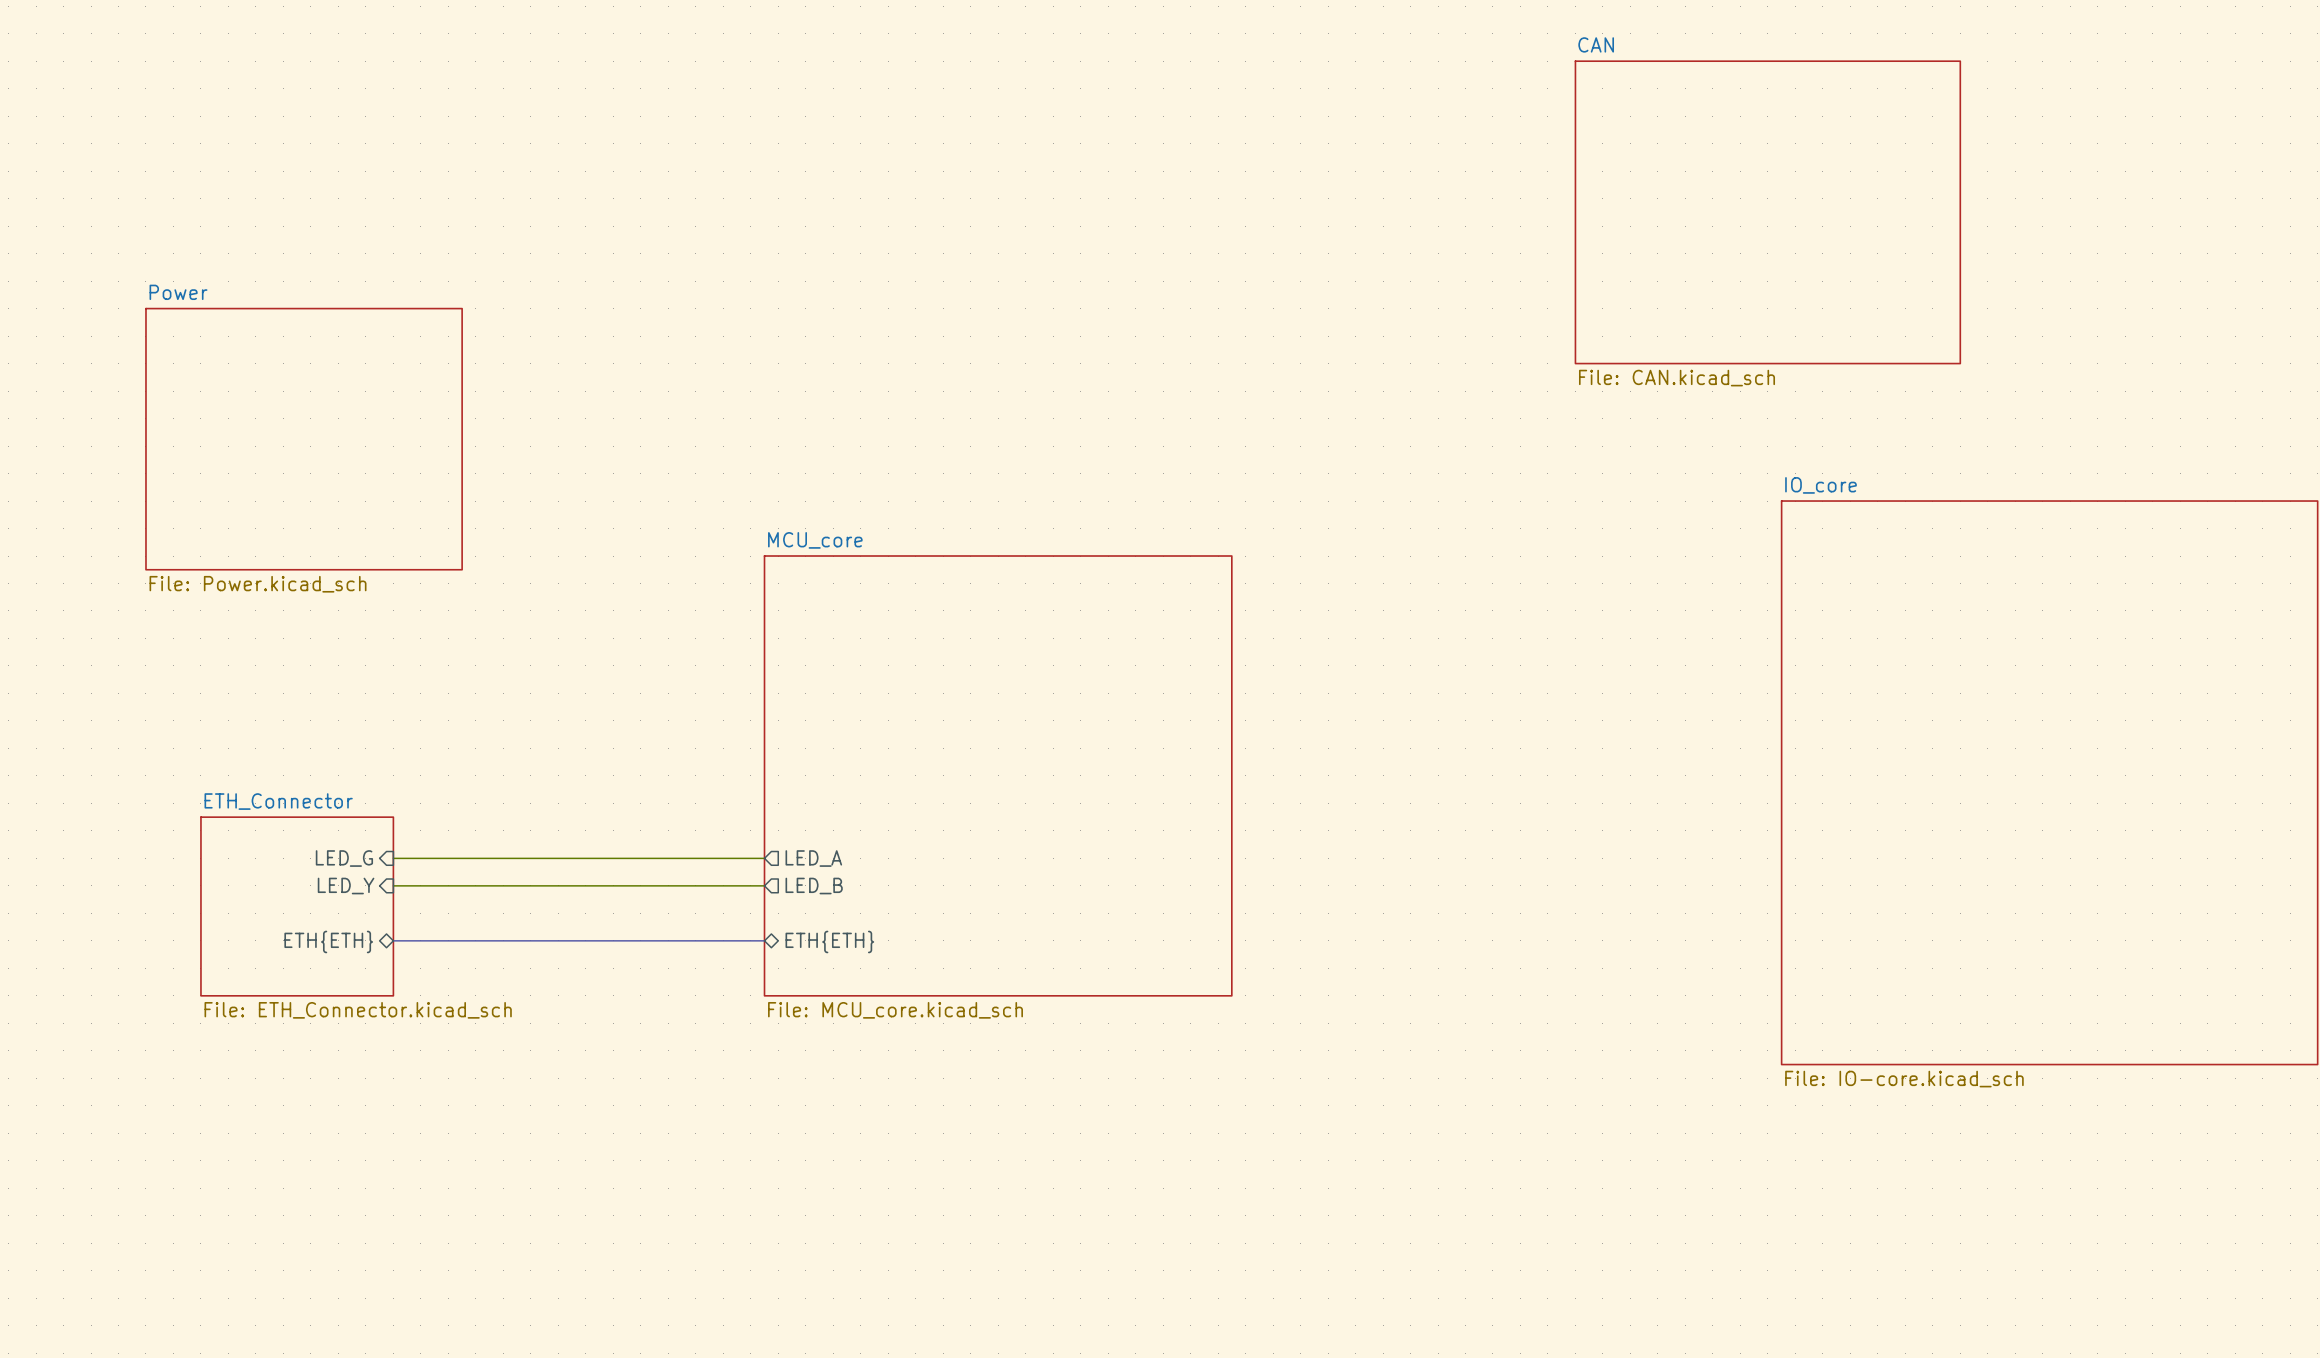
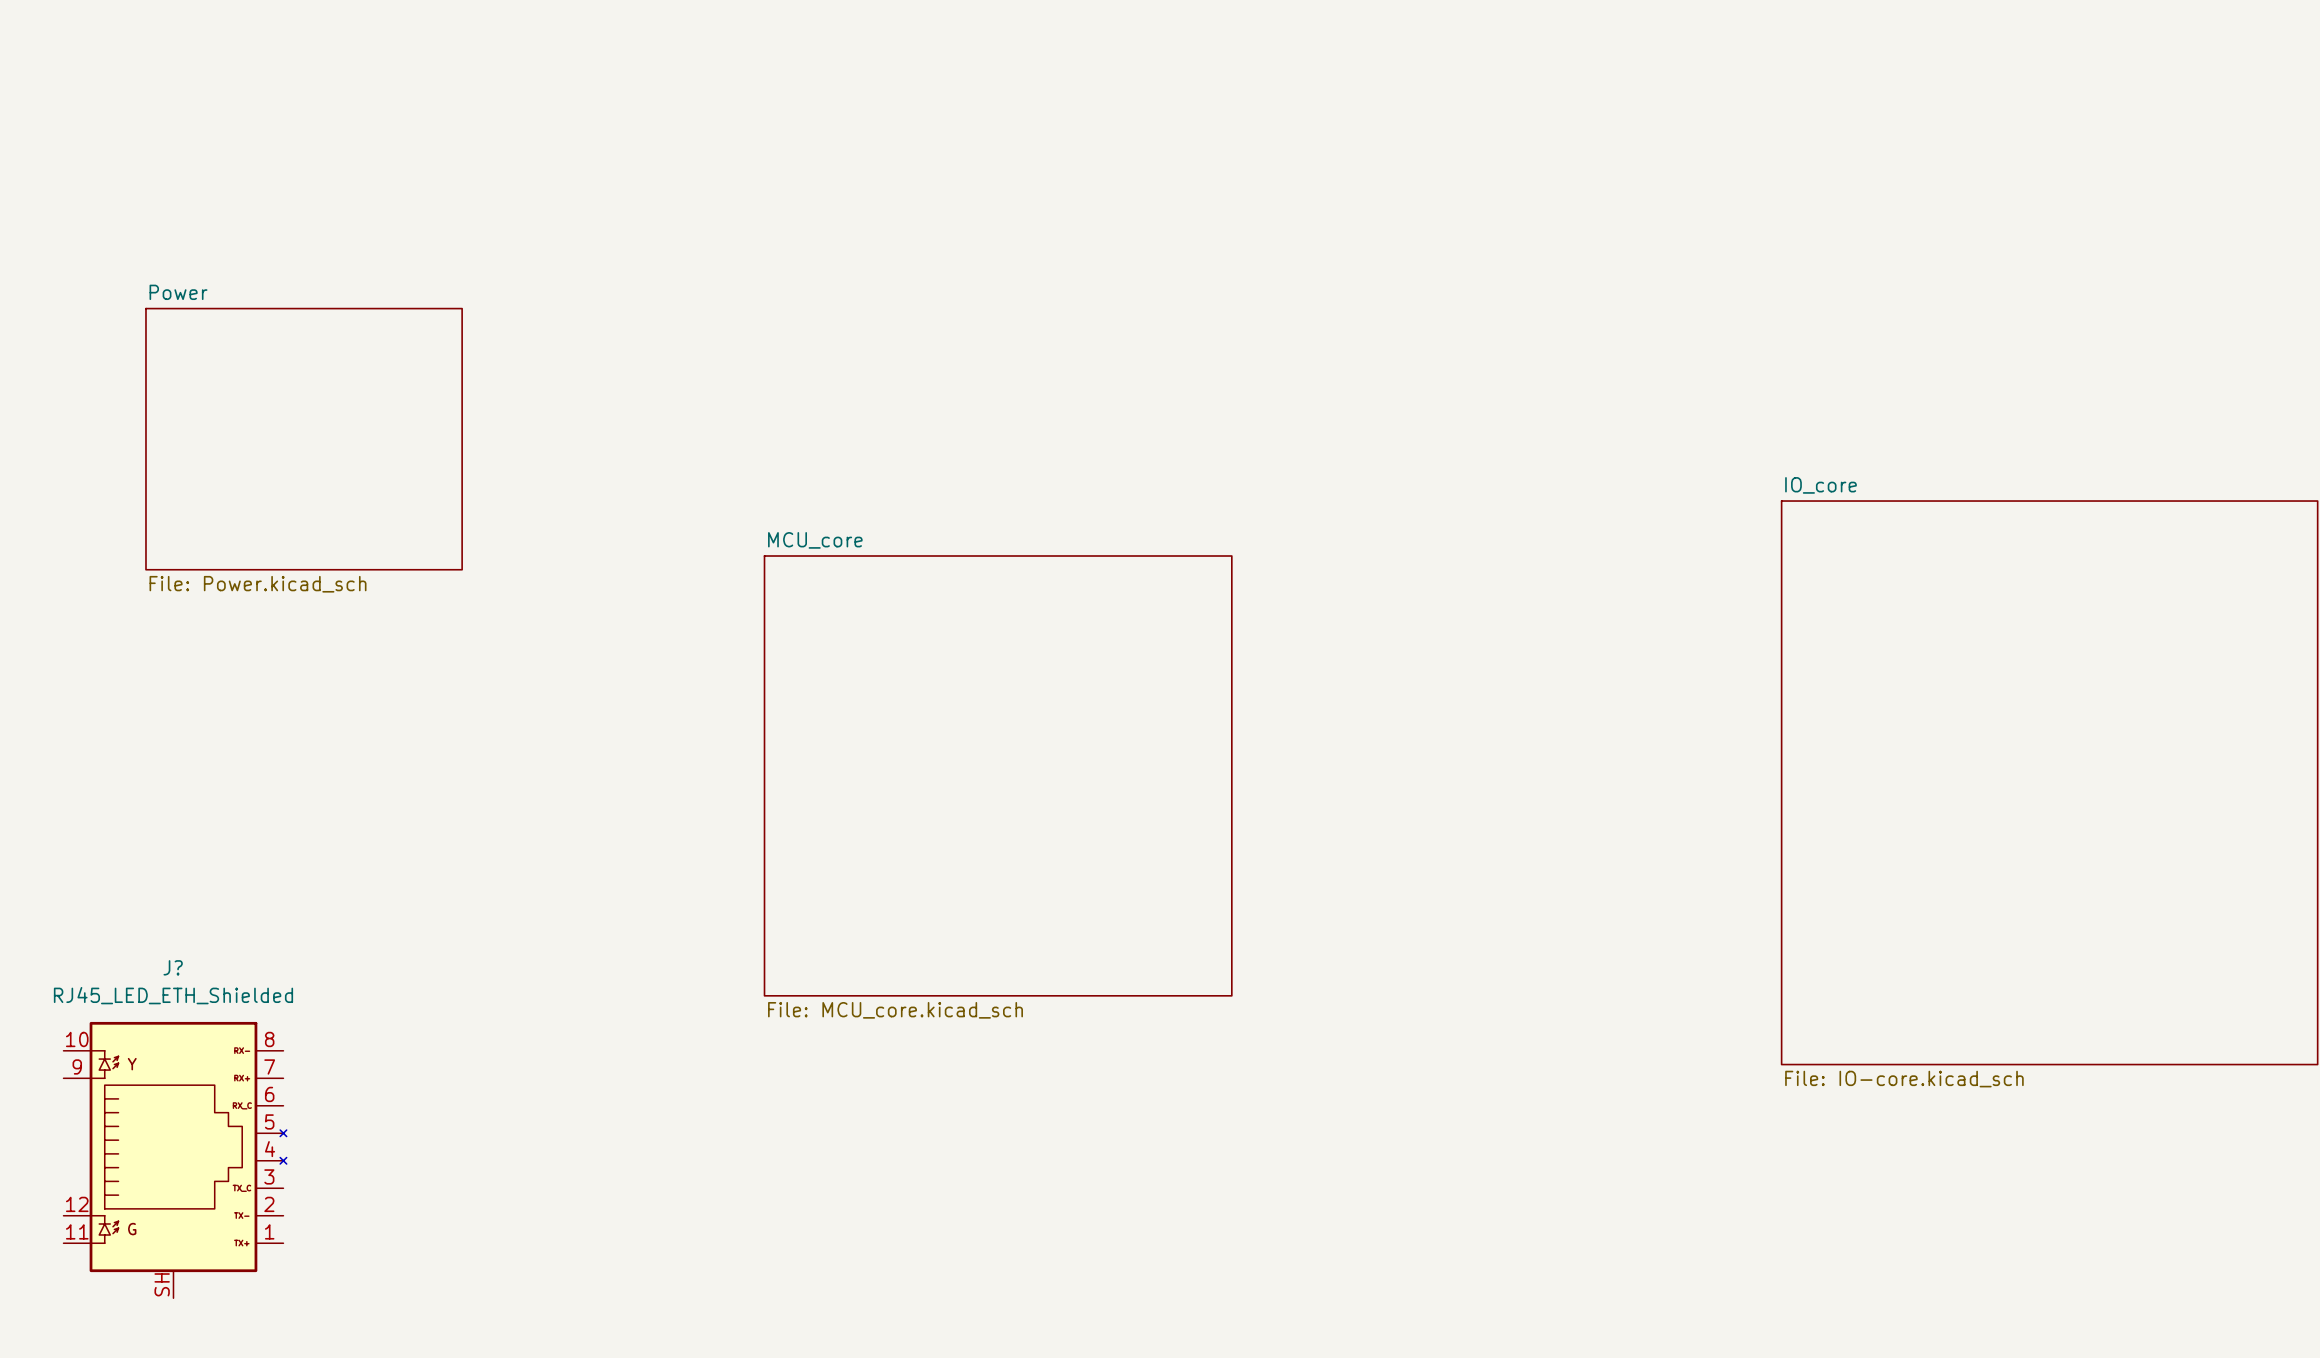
sheet CAN: File: CAN.kicad_sch (1767, 212) -> none
sheet pin: LED_G (344, 858) -> none
wire: (393, 858) (764, 858) -> none
sheet pin: LED_A (813, 858) -> none
wire: (393, 885) (764, 885) -> none
sheet pin: LED_Y (346, 886) -> none
sheet pin: LED_B (814, 886) -> none
sheet ETH_Connector: File: ETH_Connector.kicad_sch (297, 906) -> none
bus: (393, 940) (764, 940) -> none
sheet pin: ETH{ETH} (328, 941) -> none
sheet pin: ETH{ETH} (829, 941) -> none
J?: none -> RJ45_LED_ETH_Shielded (175, 1160)

